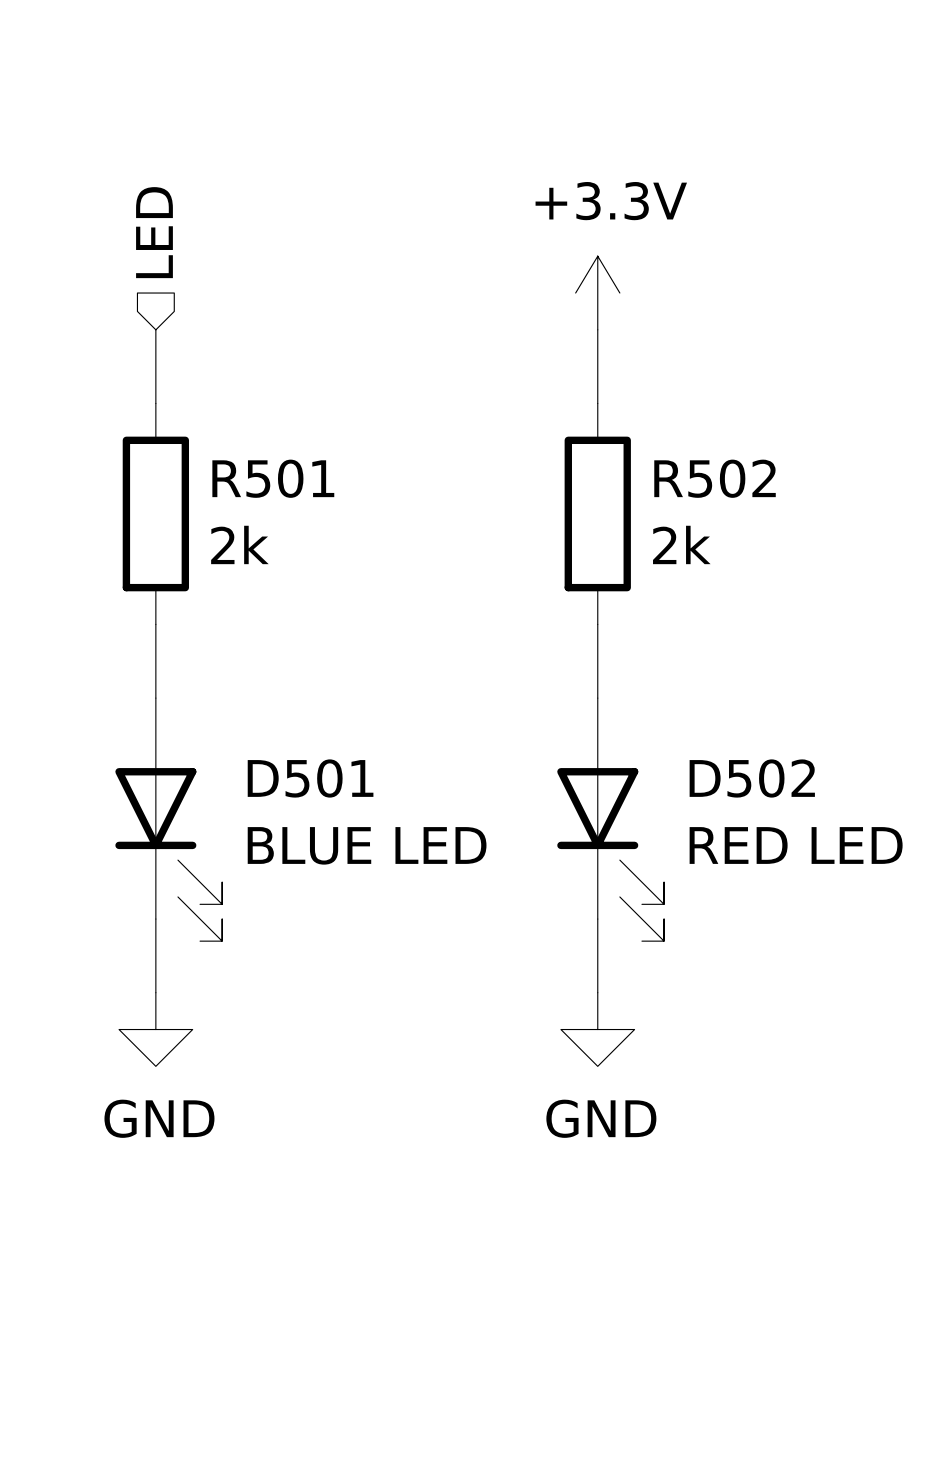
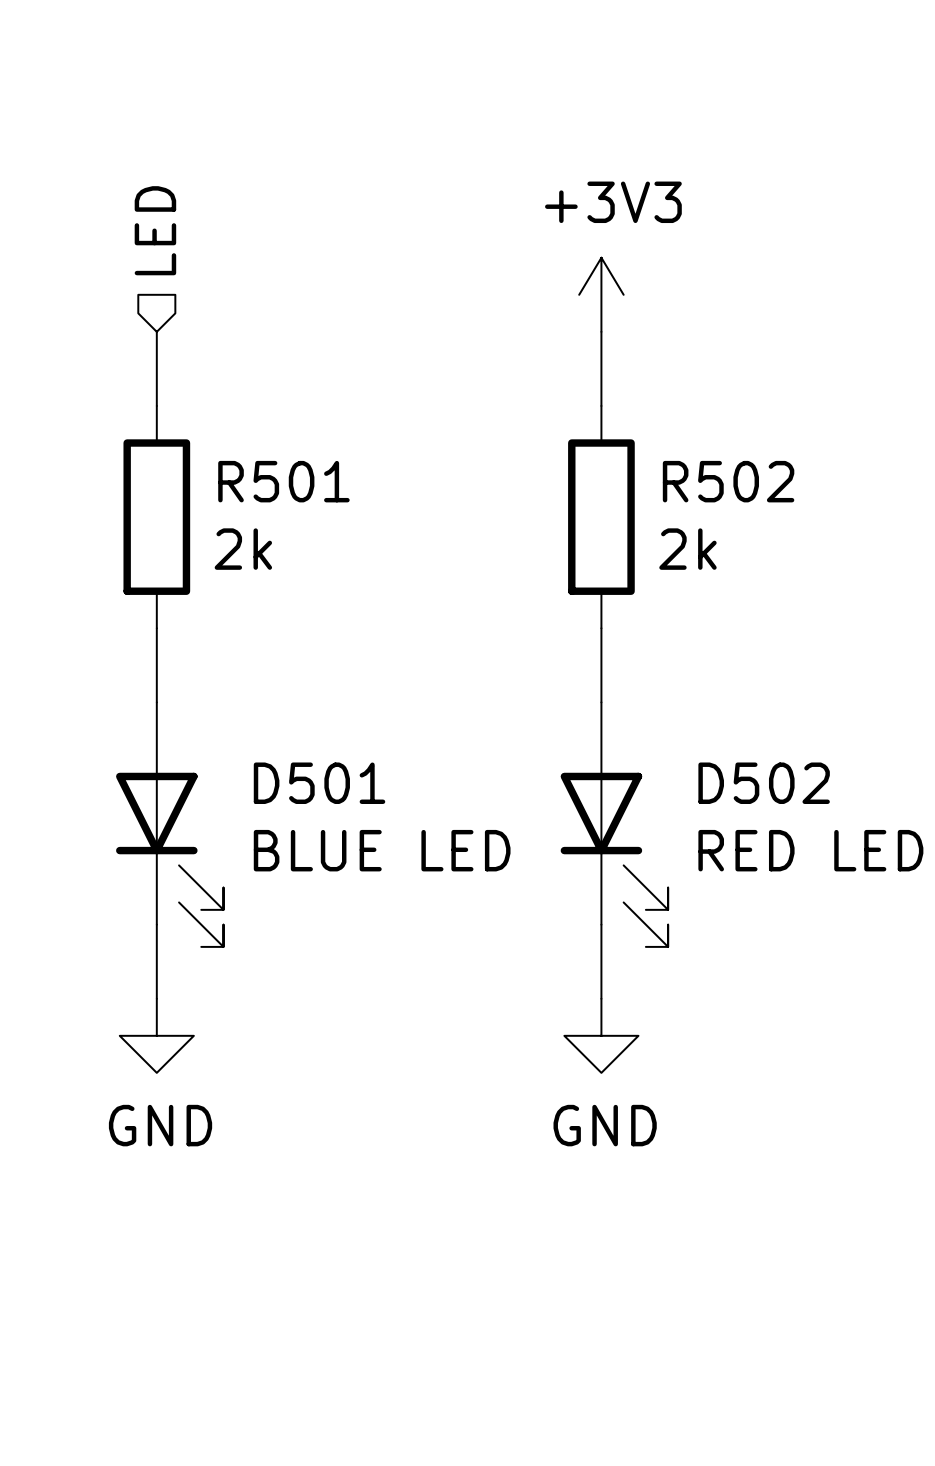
power symbol: +3.3V (597, 293) -> +3V3 (601, 294)

